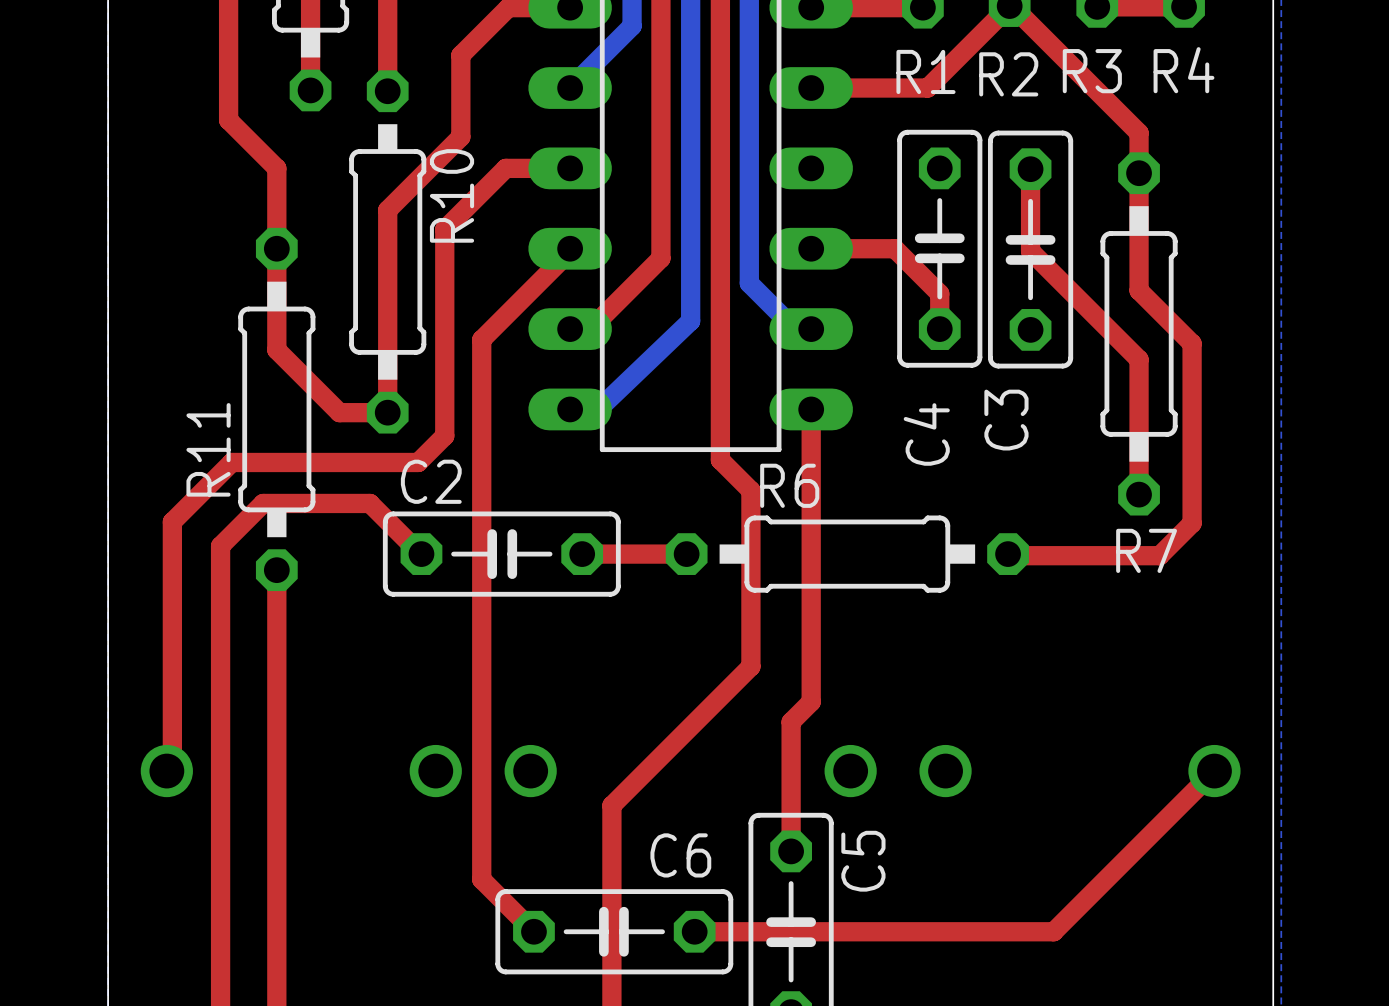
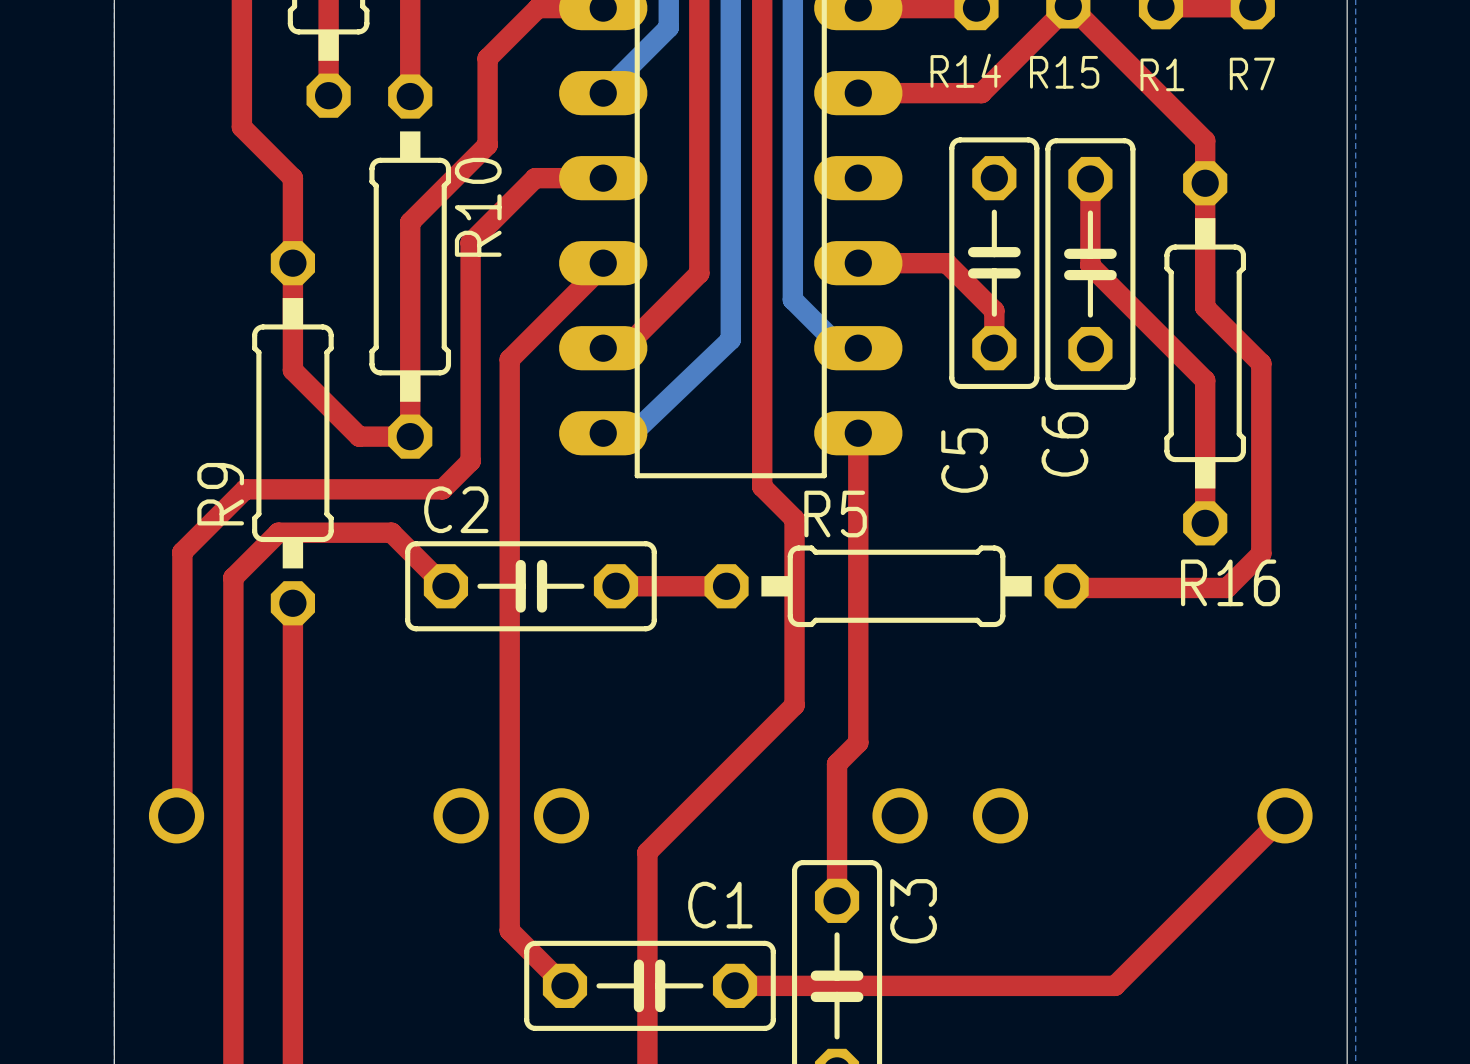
R4 name: R4 (1183, 70) -> R7 (1252, 74)
R1 name: R1 (925, 71) -> R14 (965, 70)
R3 name: R3 (1092, 71) -> R1 (1162, 74)
R2 name: R2 (1008, 74) -> R15 (1064, 72)
C3 name: C3 (1006, 420) -> C6 (1064, 444)
C4 name: C4 (926, 434) -> C5 (964, 460)
R11 name: R11 (208, 449) -> R9 (220, 494)
R6 name: R6 (789, 485) -> R5 (835, 514)
R7 name: R7 (1146, 550) -> R16 (1230, 582)
C6 name: C6 (680, 855) -> C1 (720, 905)
C5 name: C5 (863, 861) -> C3 (913, 911)

